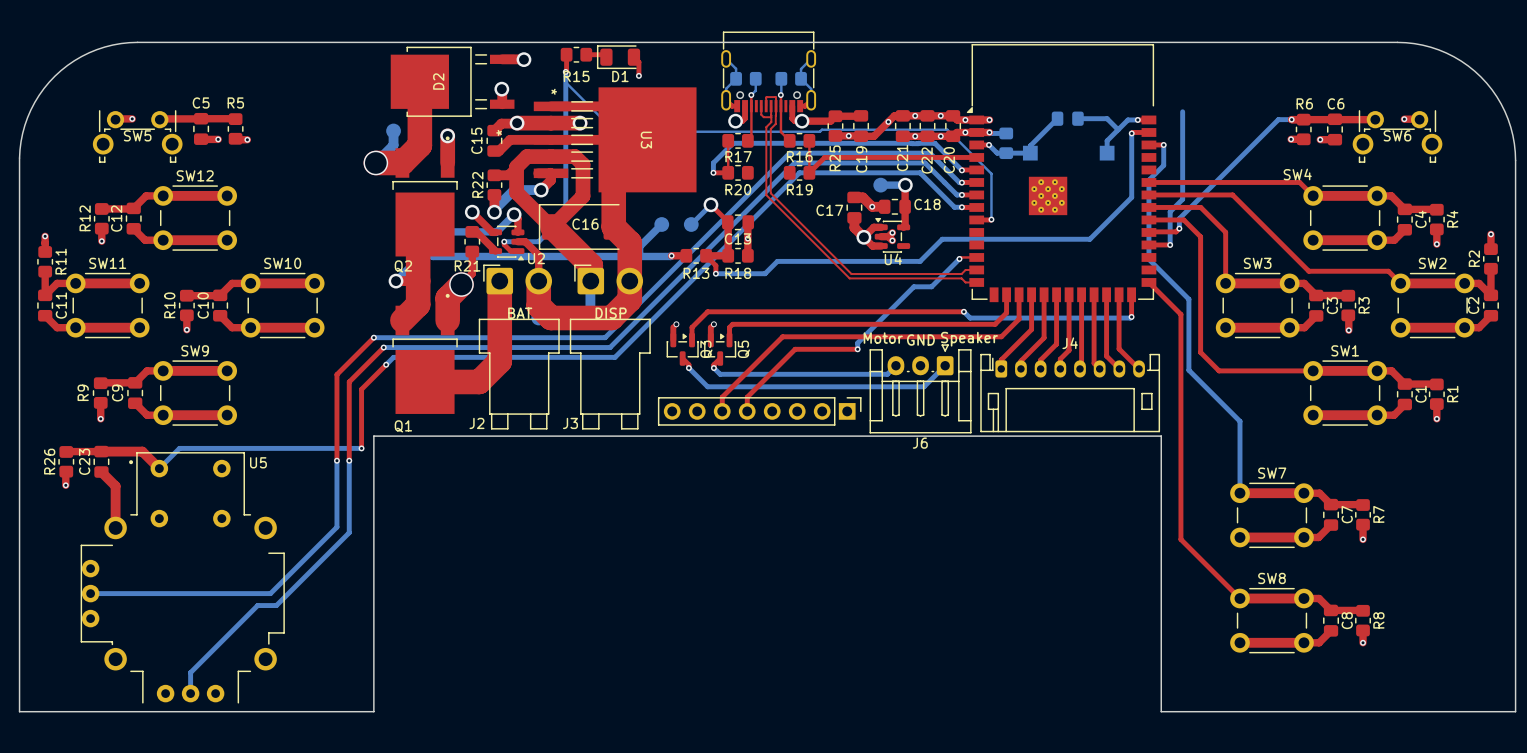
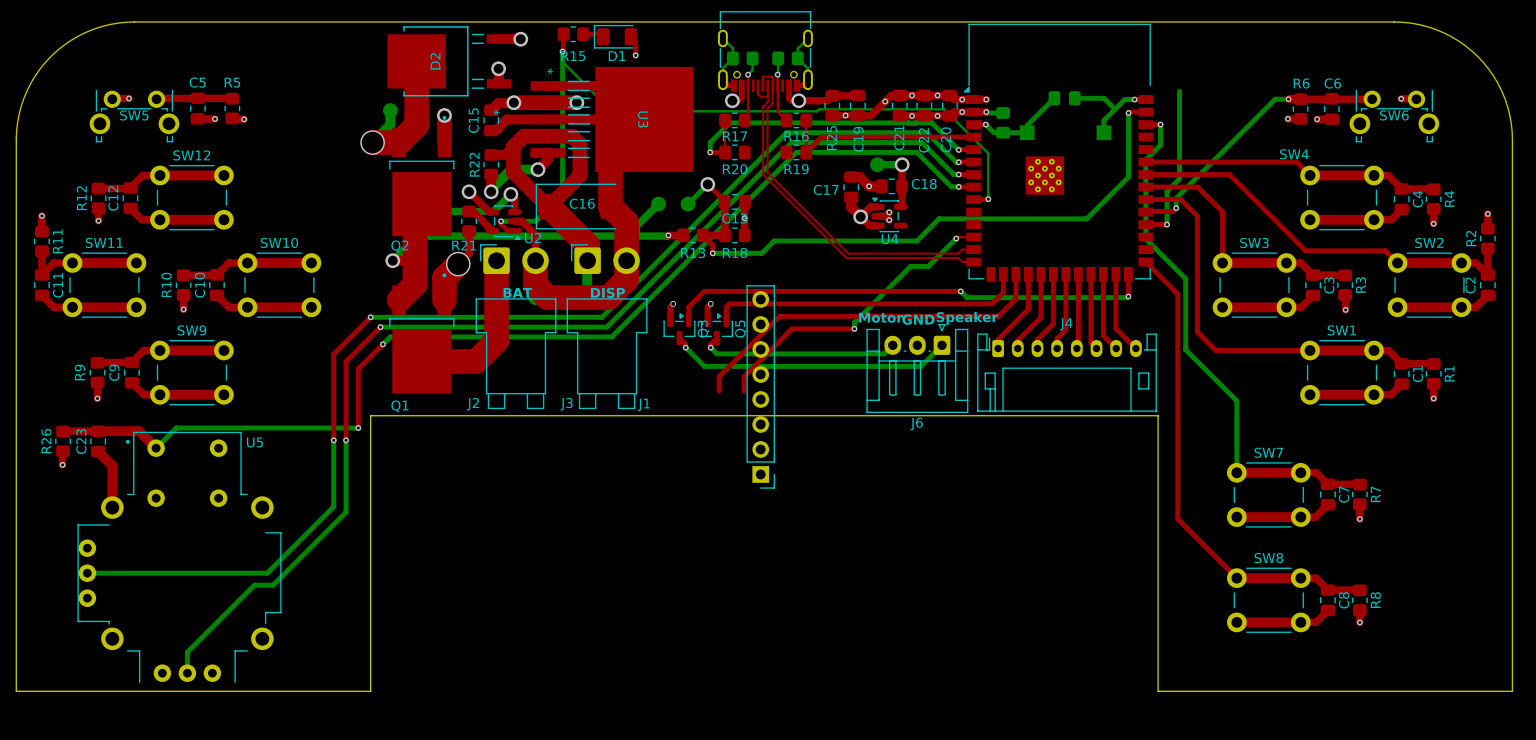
J1: none -> (760, 386)
part: (759, 411) -> none

